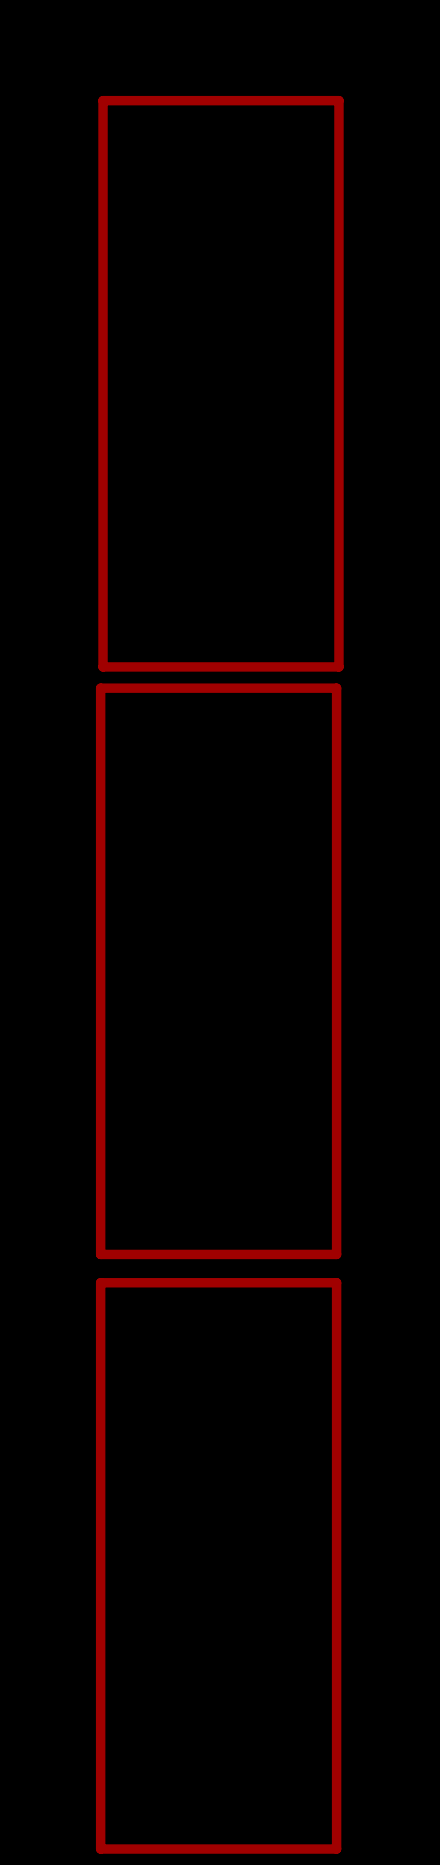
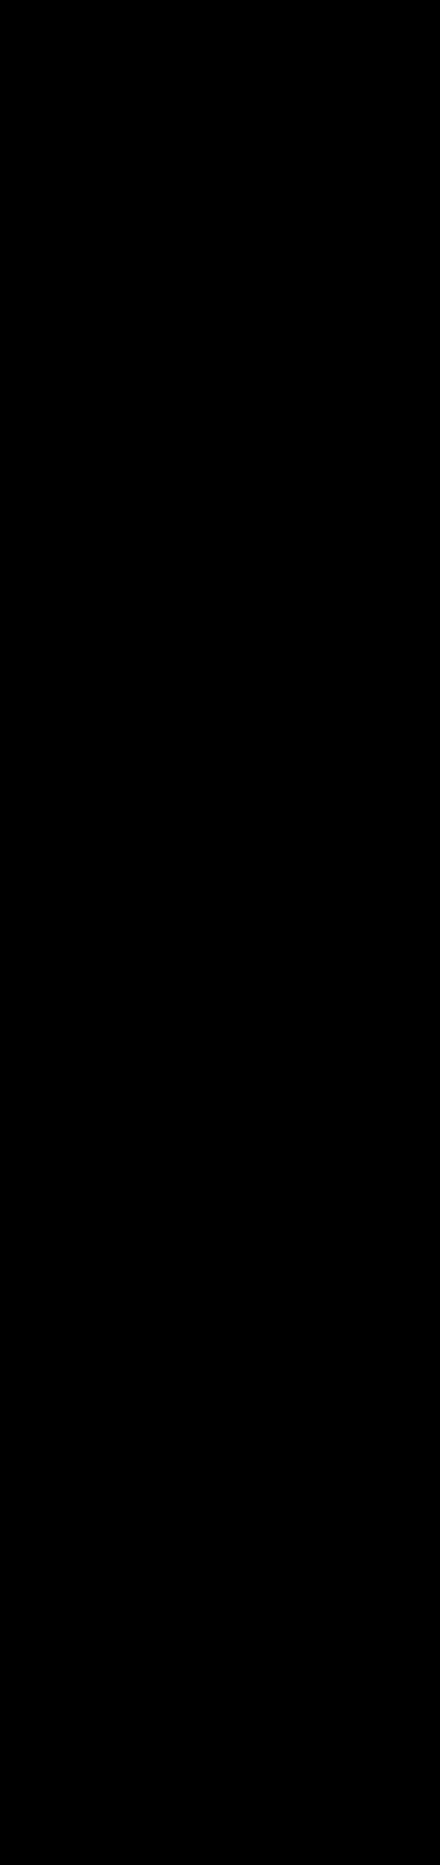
track: (103, 100) (338, 100) (338, 666) (103, 666) (103, 100) -> none
track: (100, 688) (100, 1254) (336, 1254) (336, 688) (100, 688) -> none
track: (100, 1282) (336, 1282) (336, 1849) (100, 1849) (100, 1282) -> none

